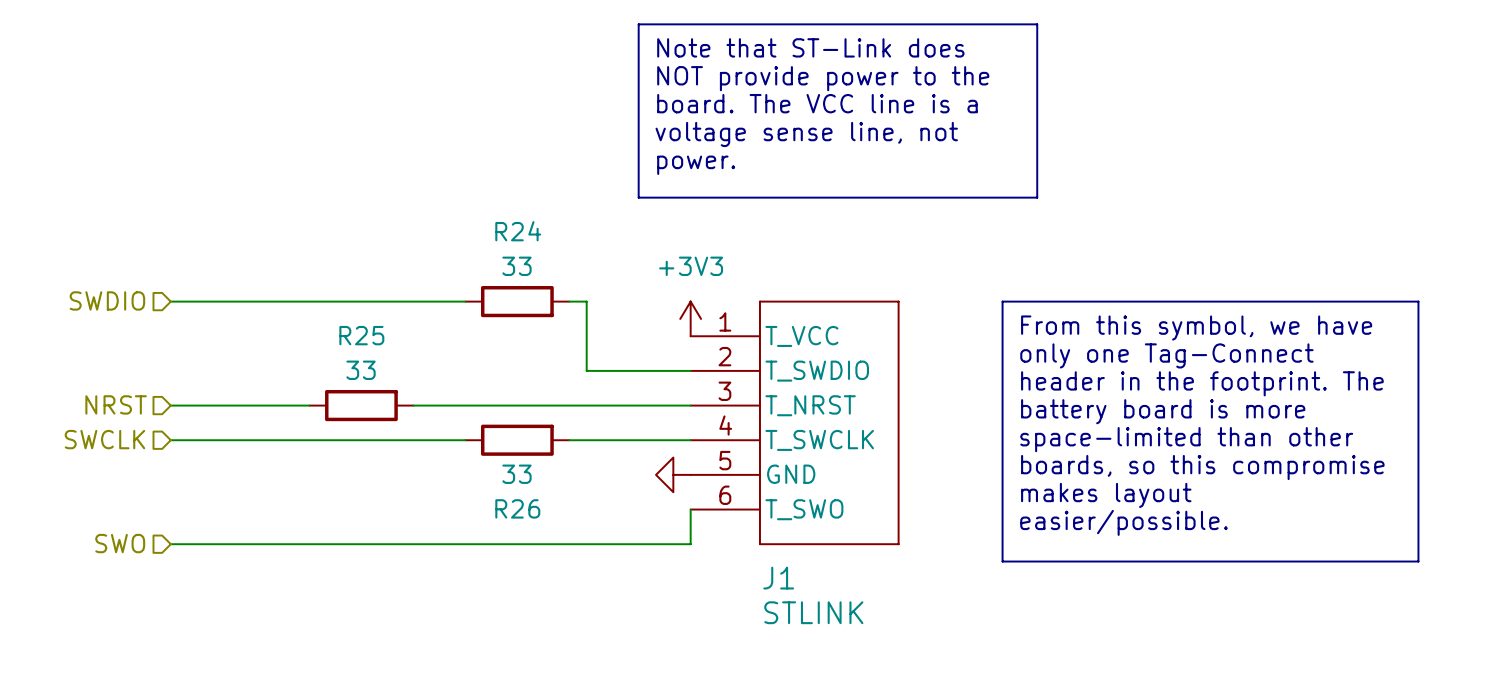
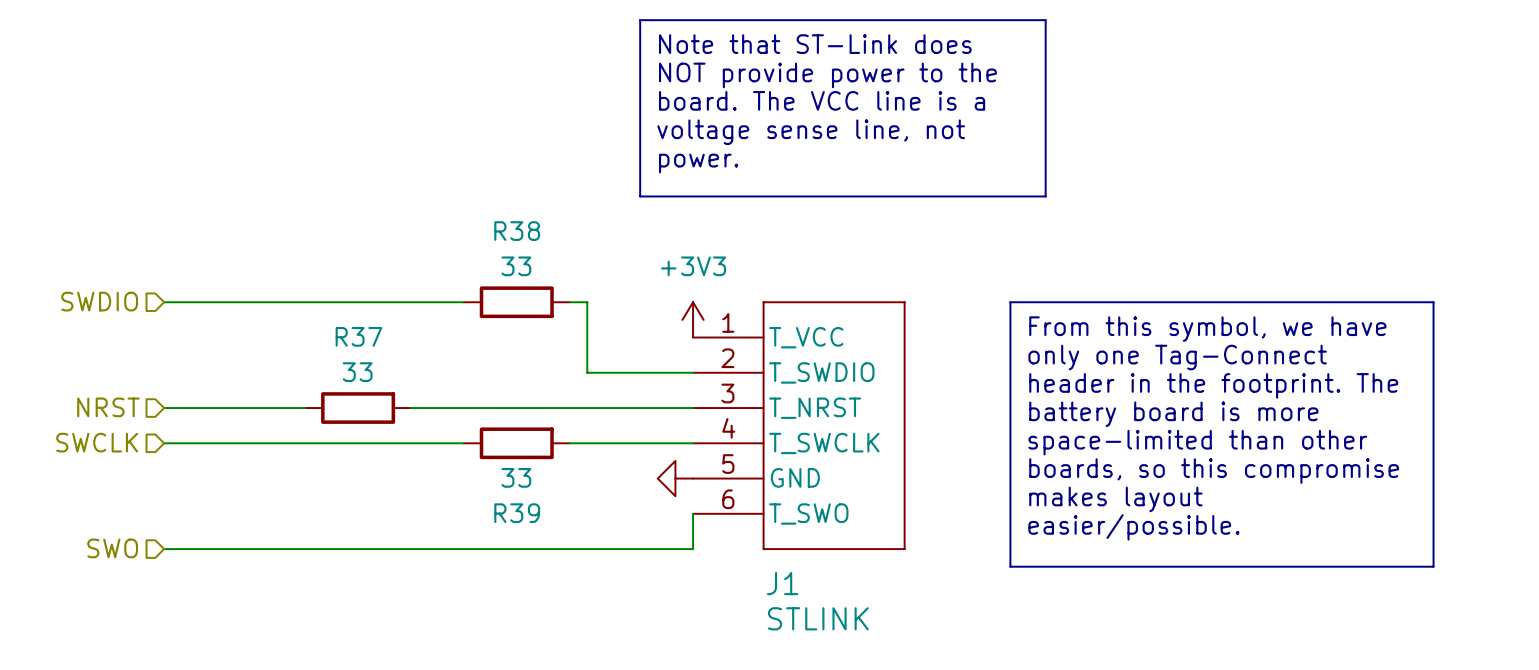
R24 name: R24 (518, 231) -> R38 (517, 231)
R25 name: R25 (361, 335) -> R37 (358, 336)
R26 name: R26 (517, 508) -> R39 (517, 513)

